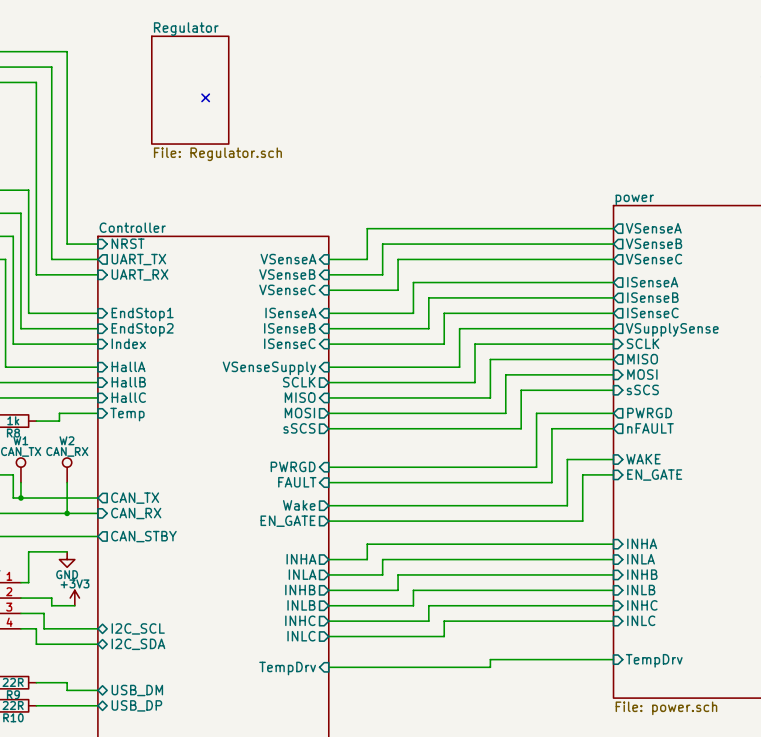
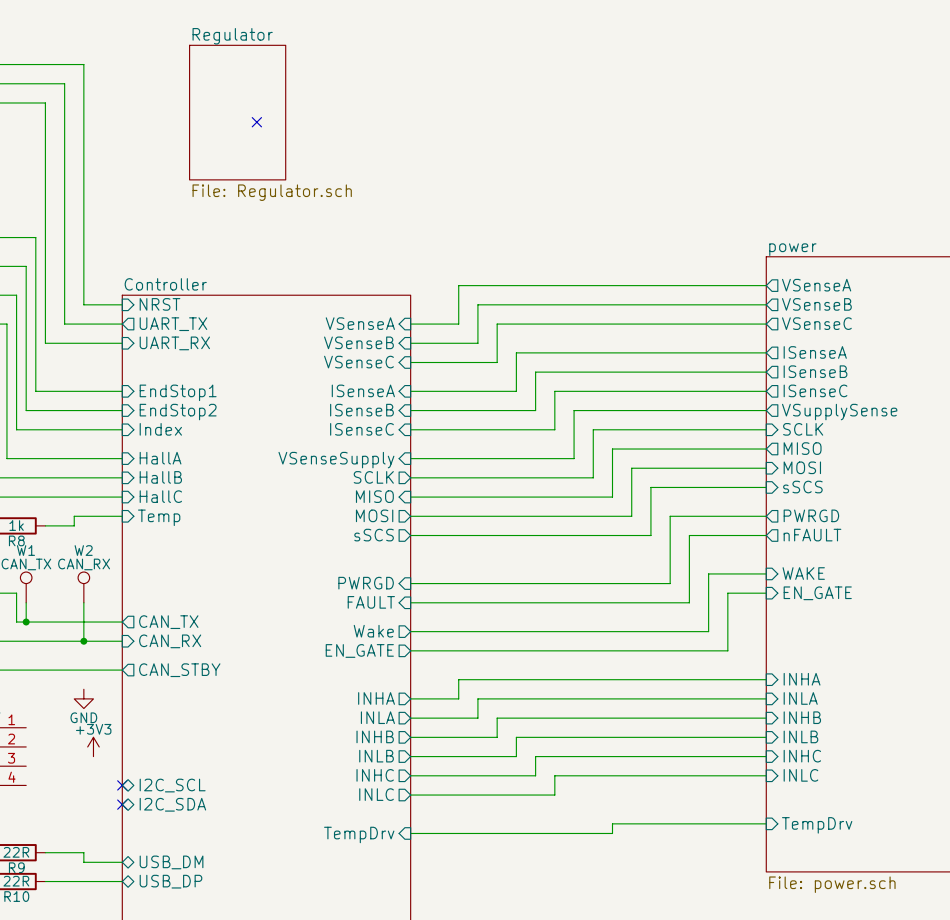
wire: (67, 551) (28, 551) (28, 582) (20, 582) -> none
wire: (20, 598) (51, 598) (51, 605) (74, 605) -> none
wire: (20, 613) (44, 613) (44, 628) (97, 628) -> none
wire: (20, 628) (36, 628) (36, 644) (97, 644) -> none
no-connect mark: none -> (122, 785)
no-connect mark: none -> (122, 804)

